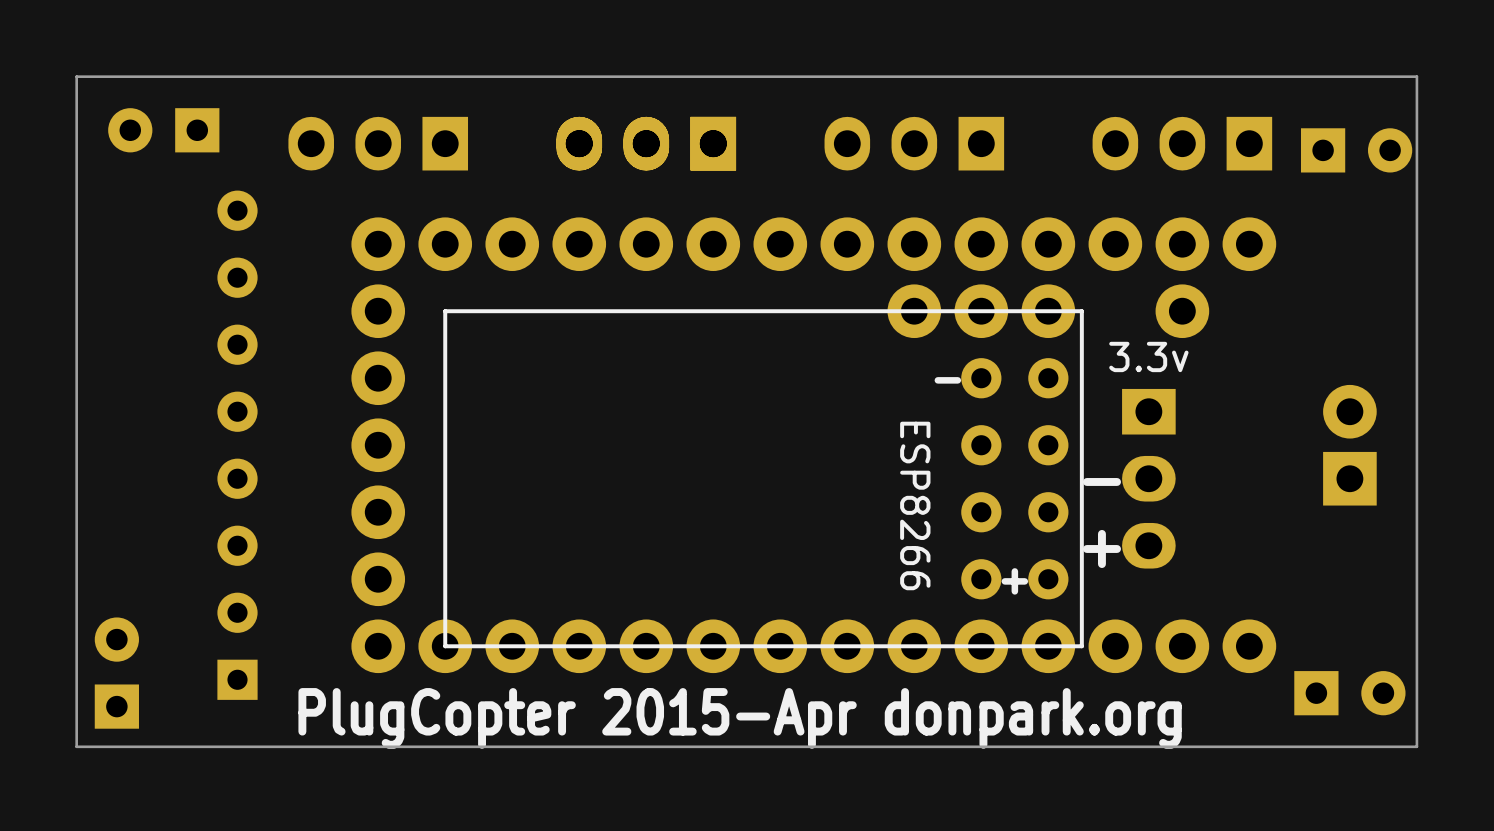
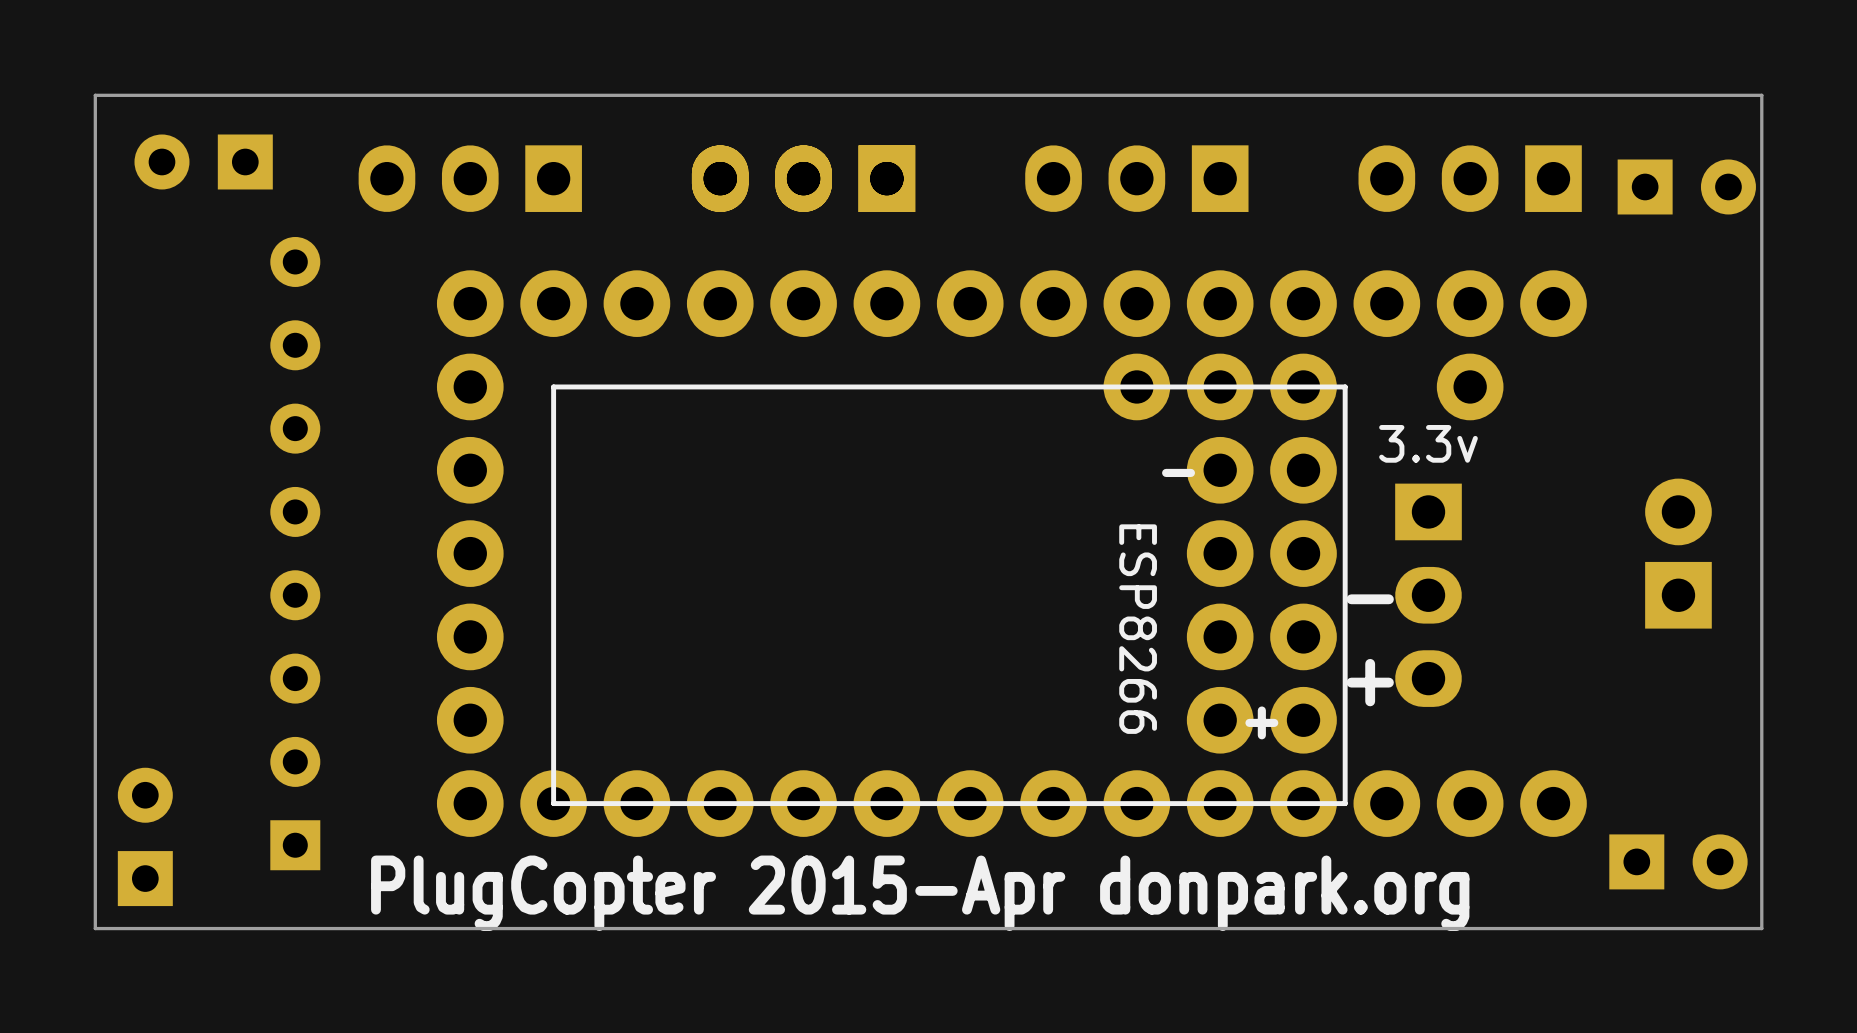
part footprint: [443, 309, 1084, 649] -> [551, 384, 1348, 807]

